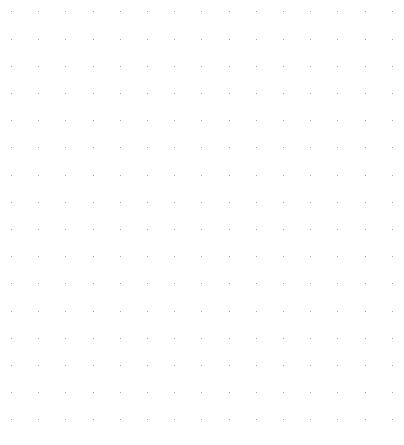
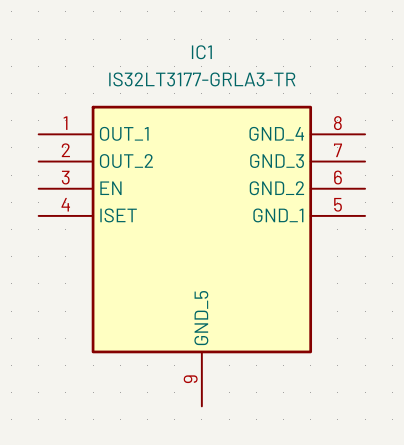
IC1: none -> IS32LT3177-GRLA3-TR (201, 256)

